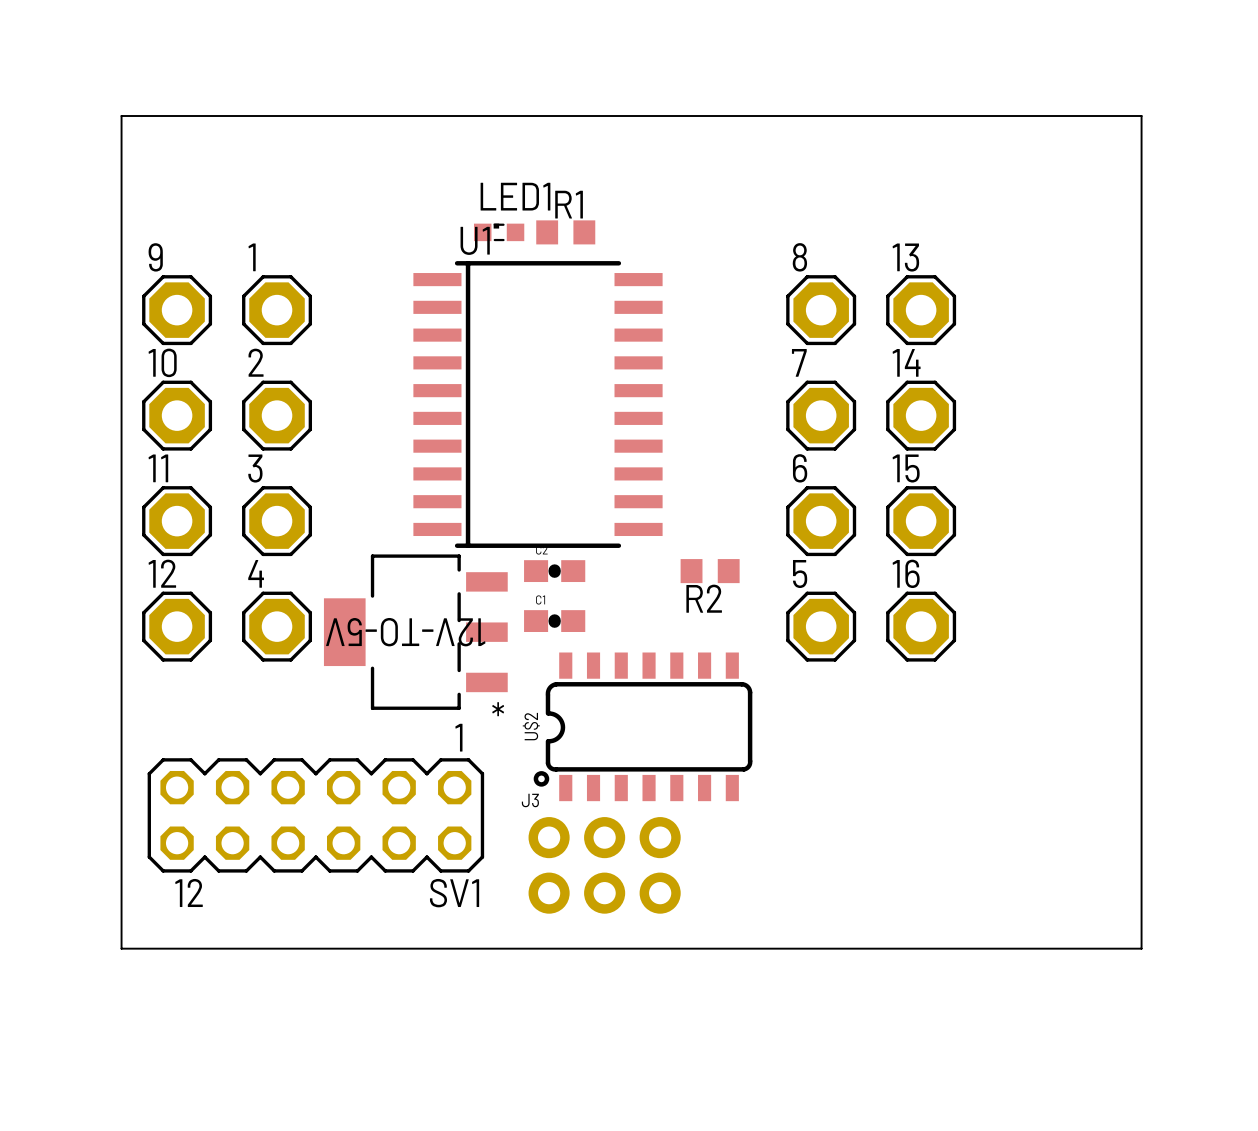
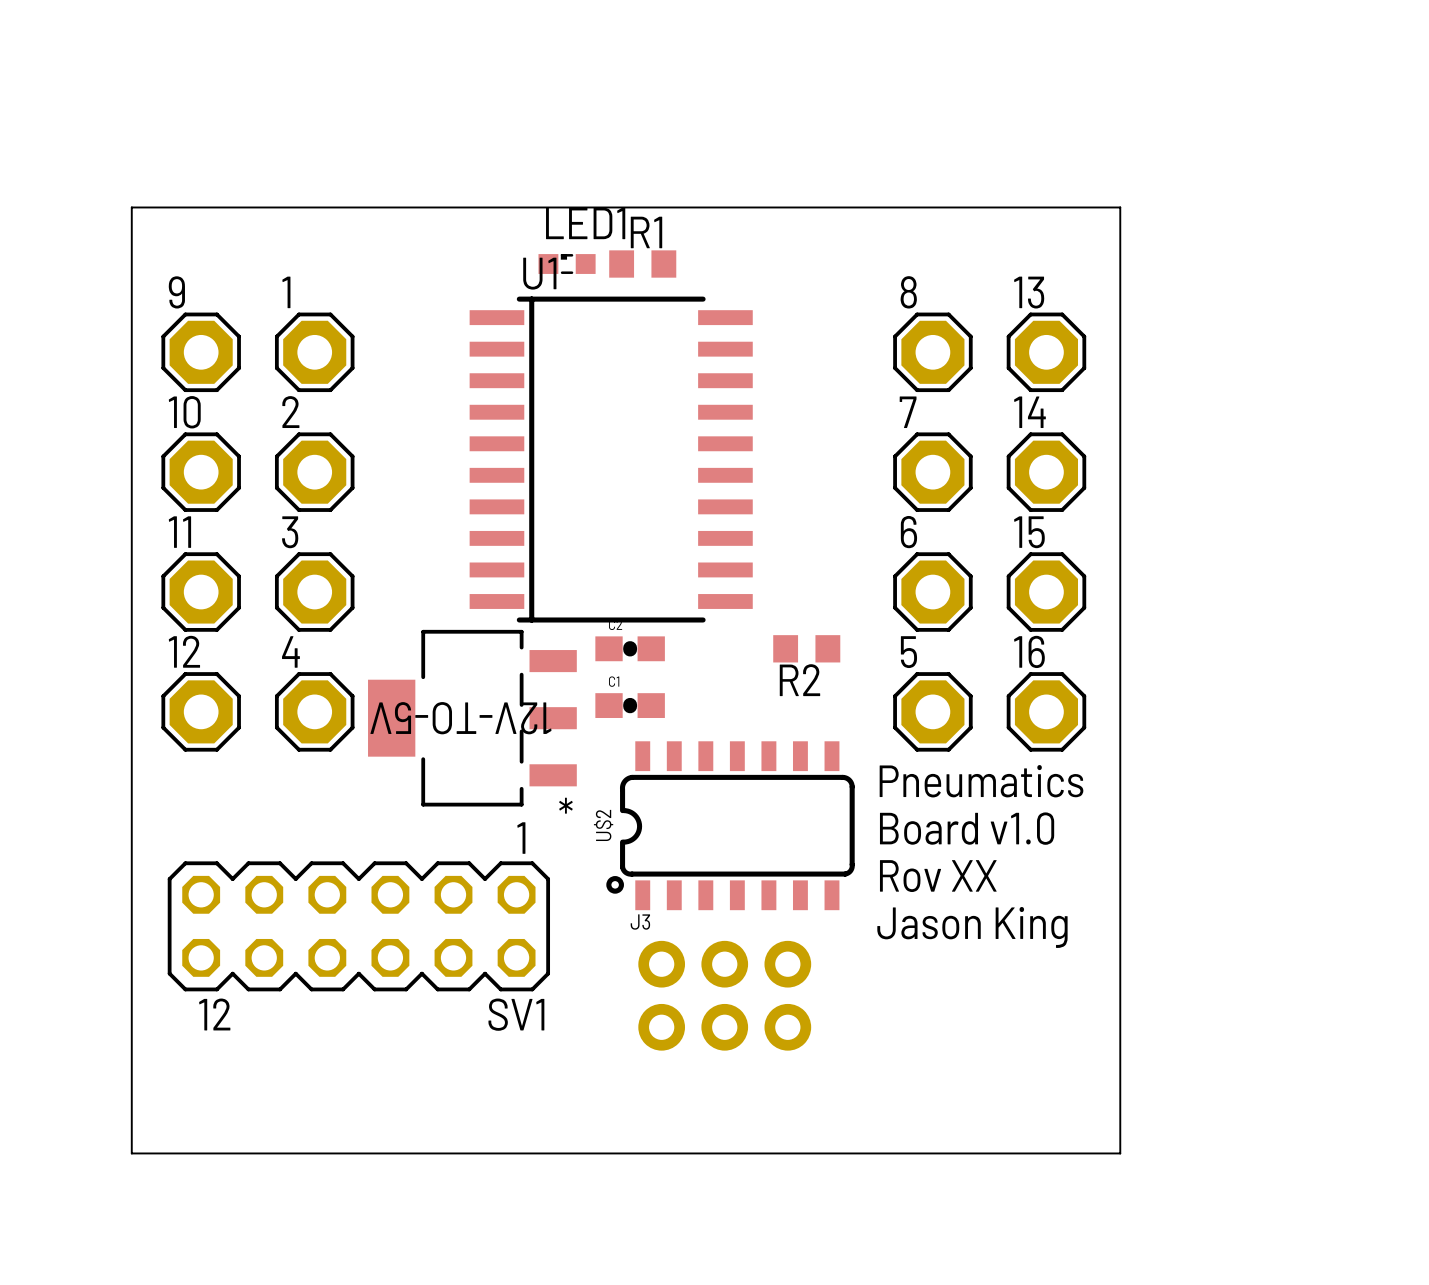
board edge: (121, 116) (1141, 116) (1141, 948) (121, 948) (121, 116) -> (131, 207) (131, 1153) (1120, 1153) (1120, 207) (131, 207)
text: none -> Pneumatics (981, 781)
text: none -> Board v1.0 (967, 828)
text: none -> Rov XX (938, 876)
text: none -> Jason King (972, 927)
J3 position: (604, 865) -> (724, 995)

